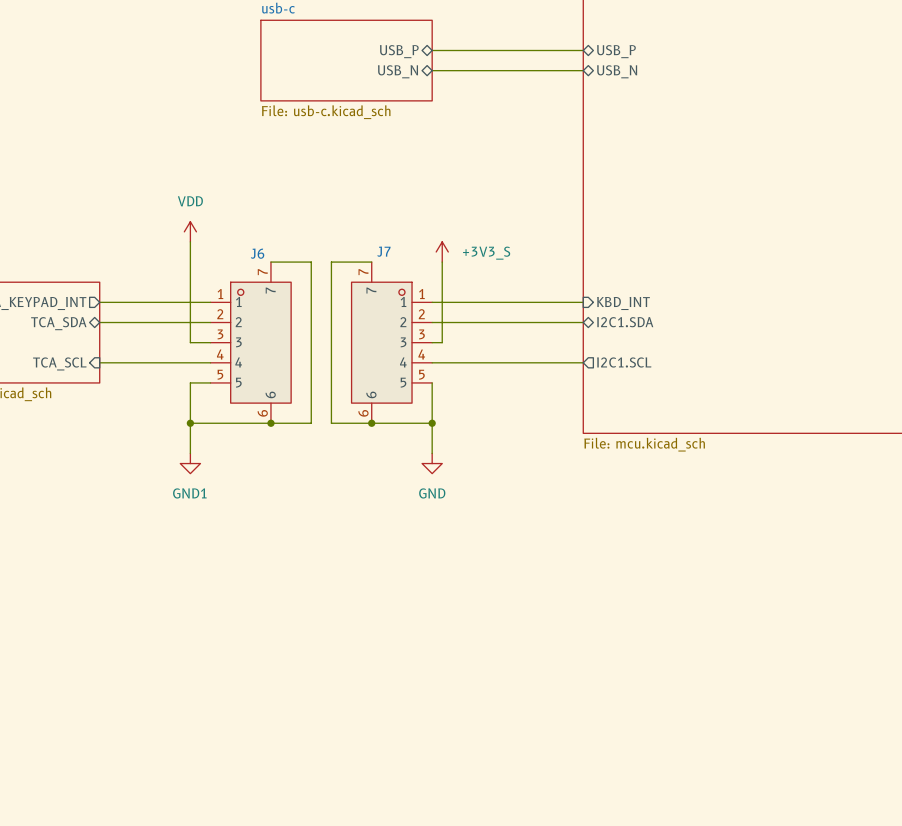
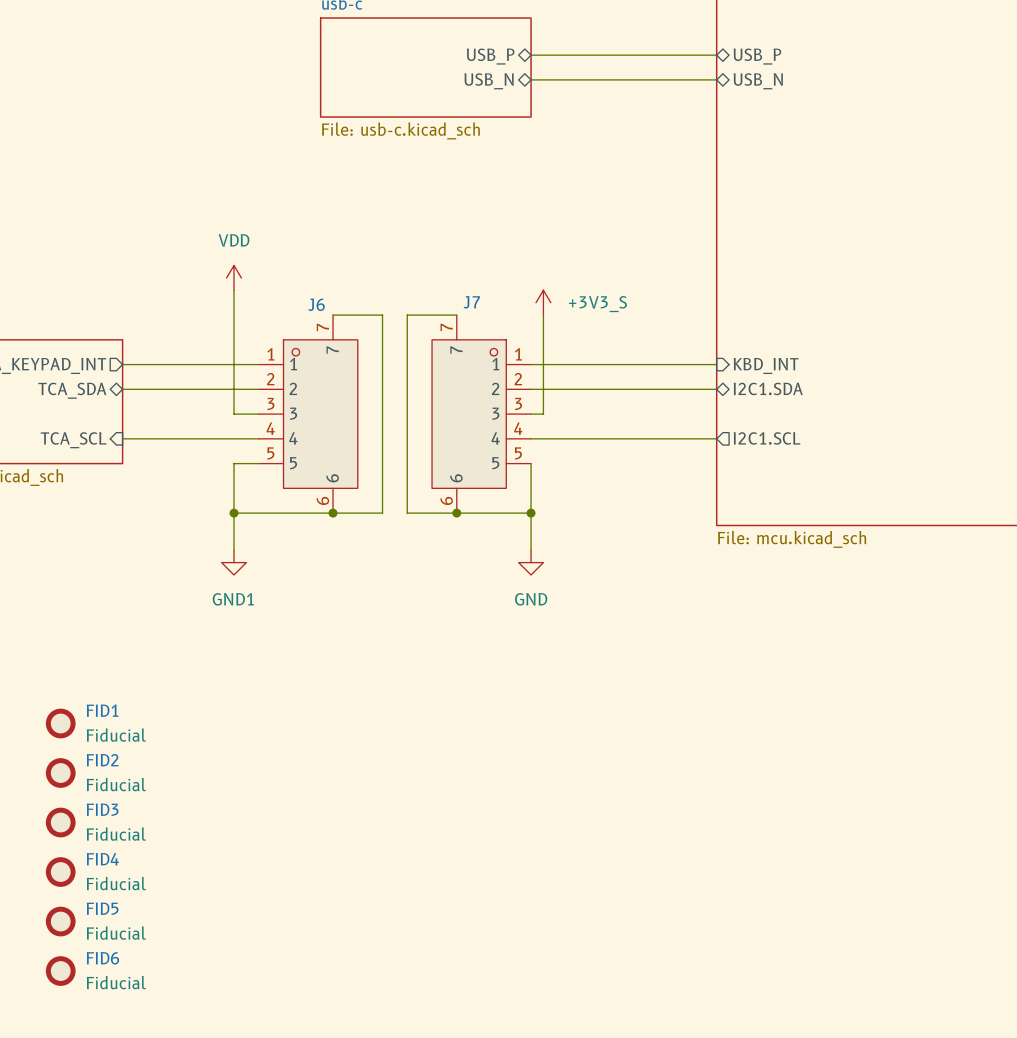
FID1: none -> Fiducial (60, 723)
FID2: none -> Fiducial (60, 773)
FID3: none -> Fiducial (60, 822)
FID4: none -> Fiducial (60, 872)
FID5: none -> Fiducial (60, 921)
FID6: none -> Fiducial (60, 971)

